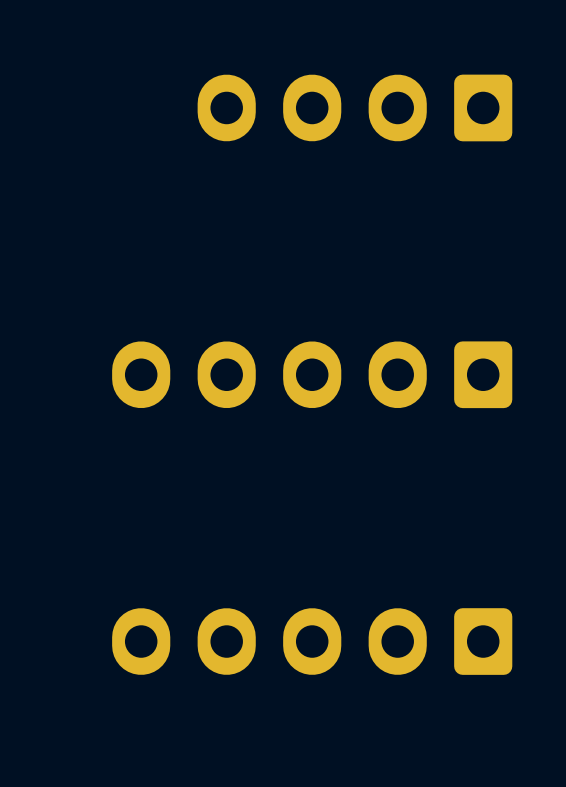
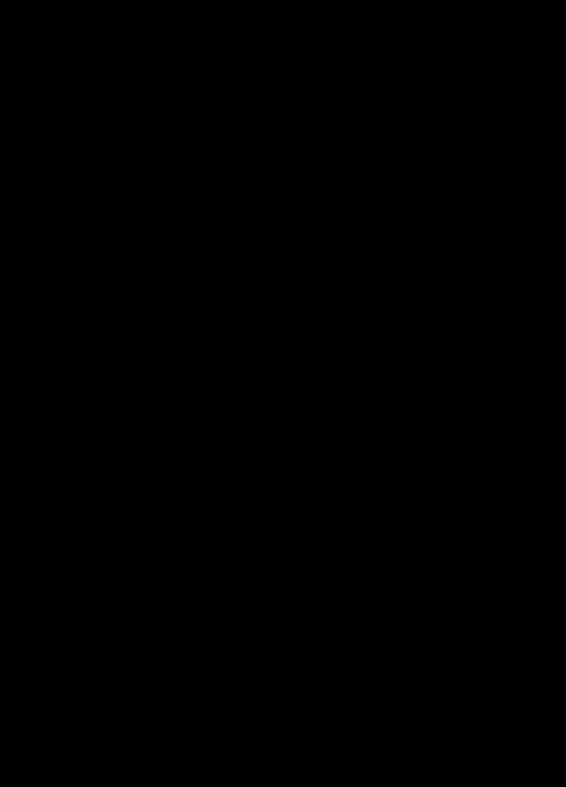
part: (354, 107) -> none
part: (312, 374) -> none
part: (312, 641) -> none

